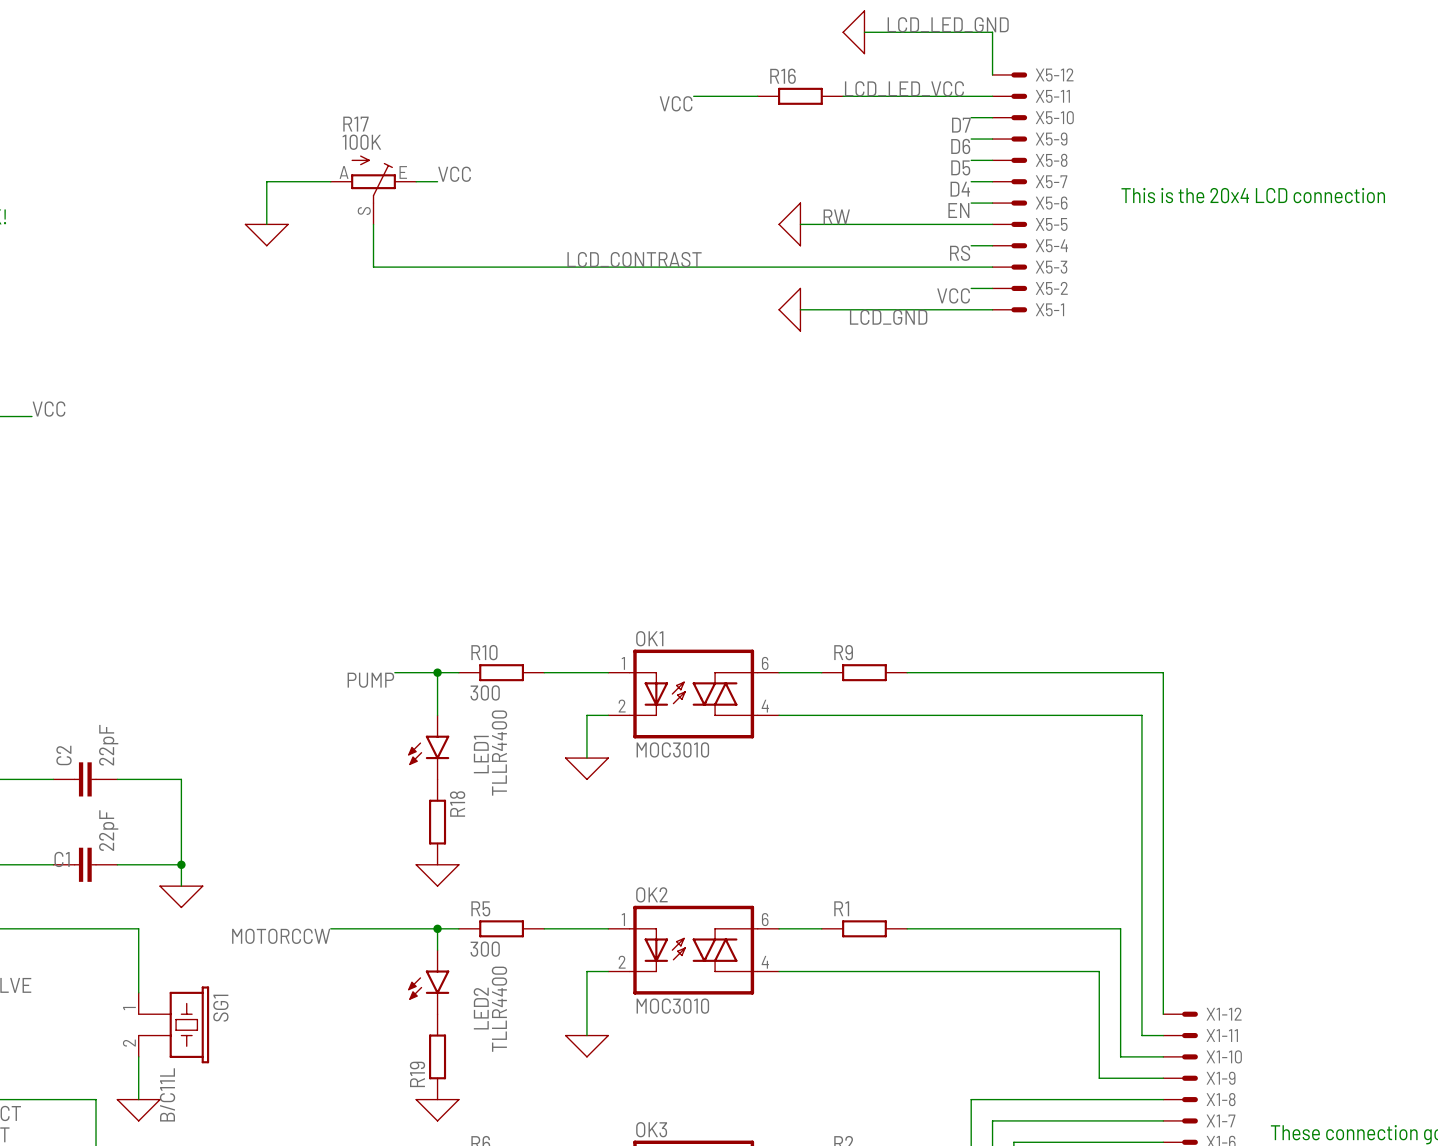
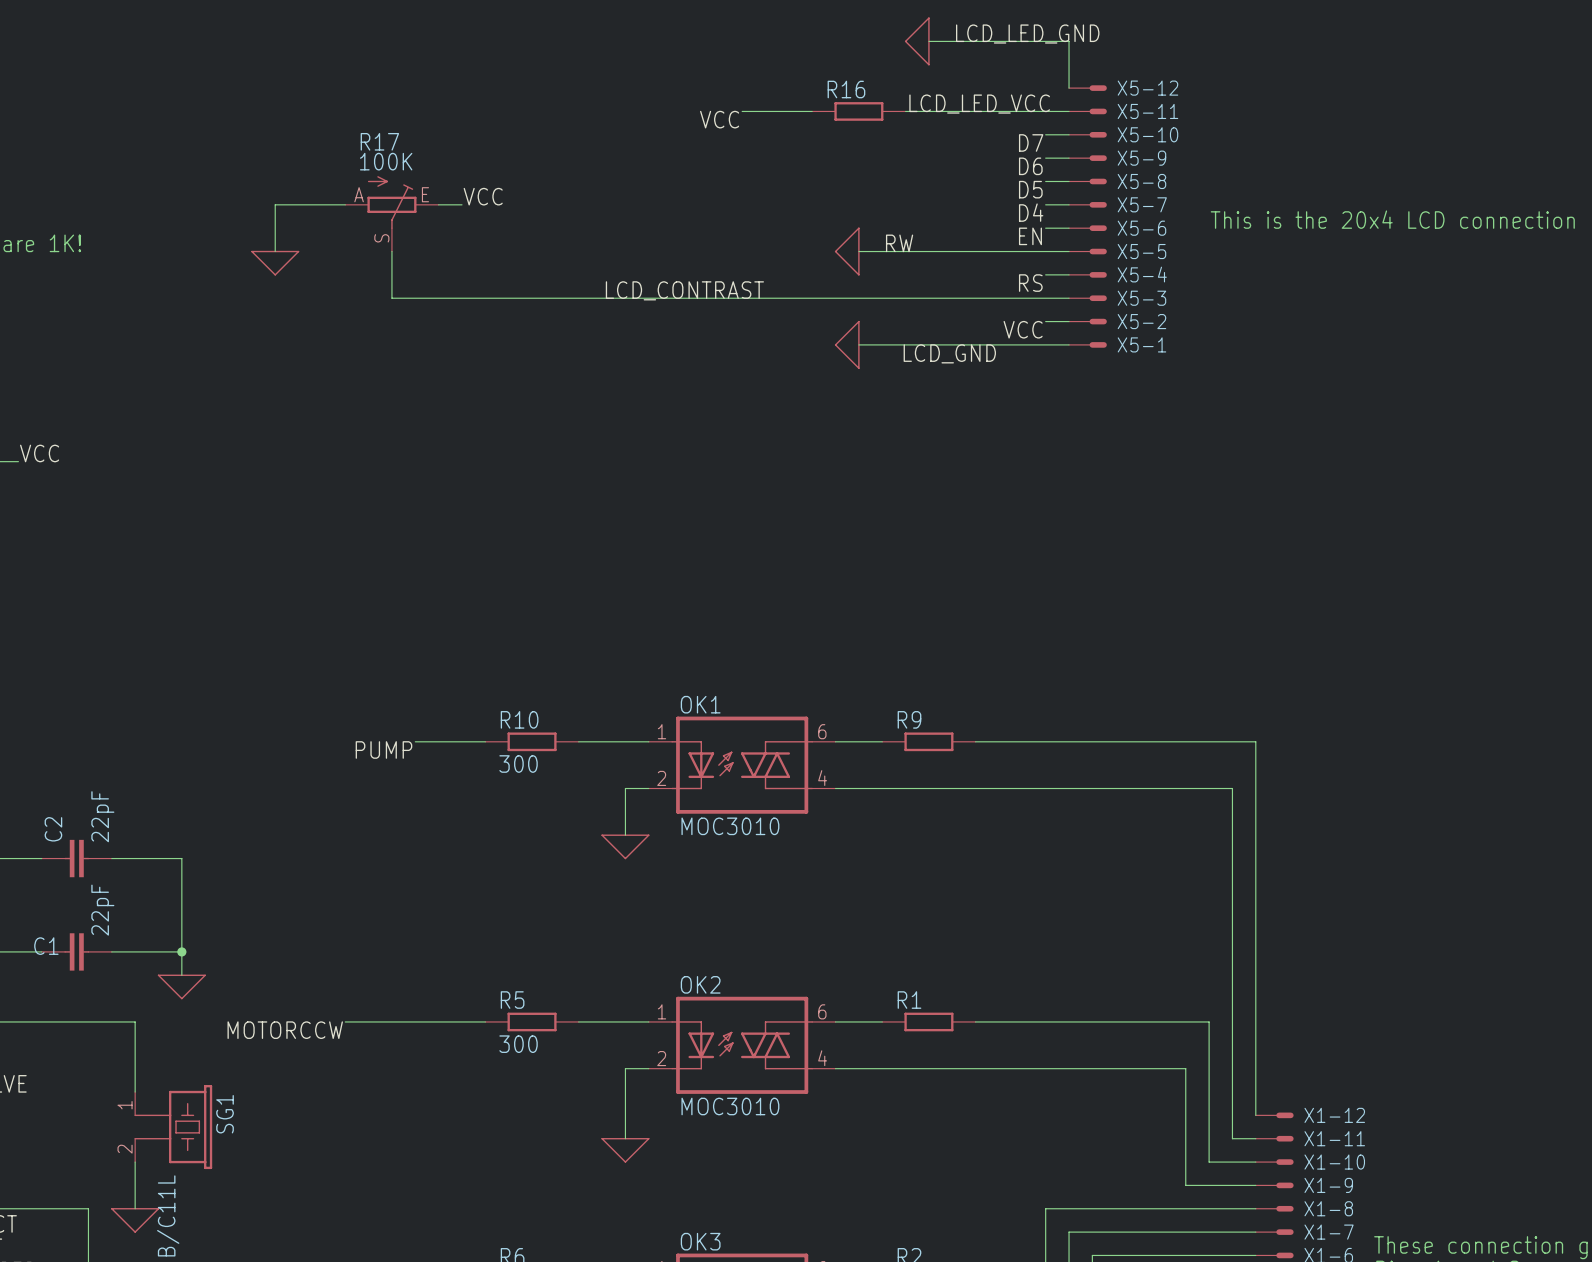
wire: (437, 672) (437, 715) -> none
junction: (437, 672) -> none
LED1: TLLR4400 (428, 747) -> none
R18: (437, 822) -> none
power symbol: (437, 875) -> none
wire: (437, 928) (437, 950) -> none
junction: (437, 928) -> none
LED2: TLLR4400 (428, 982) -> none
R19: (437, 1056) -> none
power symbol: (437, 1110) -> none

